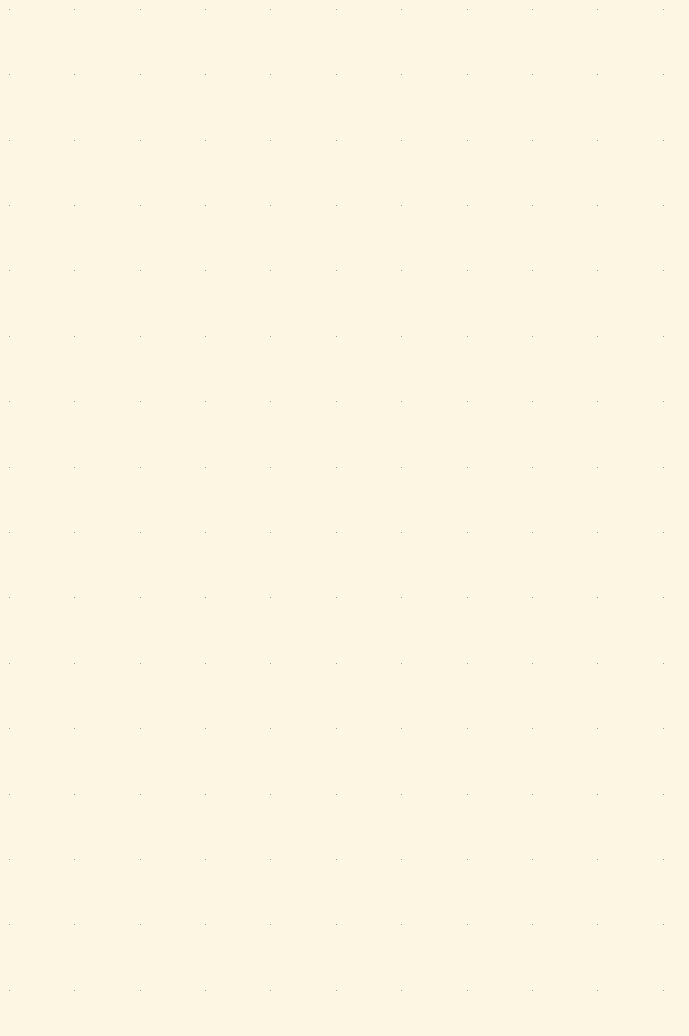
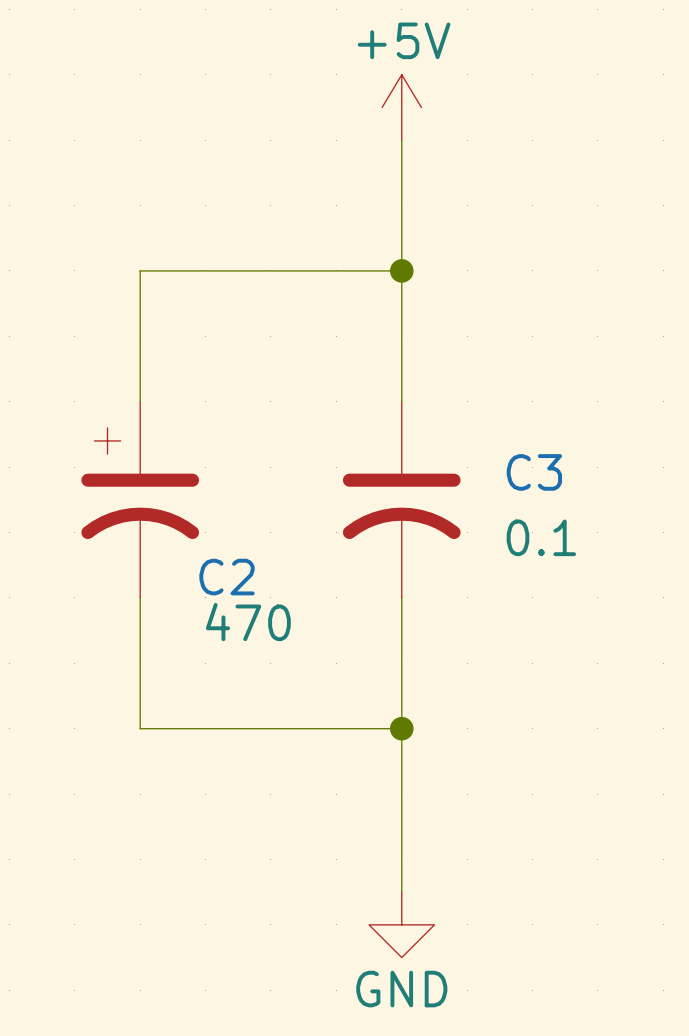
power symbol: none -> +5V (401, 107)
wire: none -> (401, 140) (401, 401)
wire: none -> (401, 270) (140, 270) (140, 401)
junction: none -> (401, 270)
C2: none -> 470 (140, 499)
C3: none -> 0.1 (401, 499)
wire: none -> (140, 597) (140, 728) (401, 728)
wire: none -> (401, 597) (401, 892)
junction: none -> (401, 728)
power symbol: none -> GND (401, 924)

